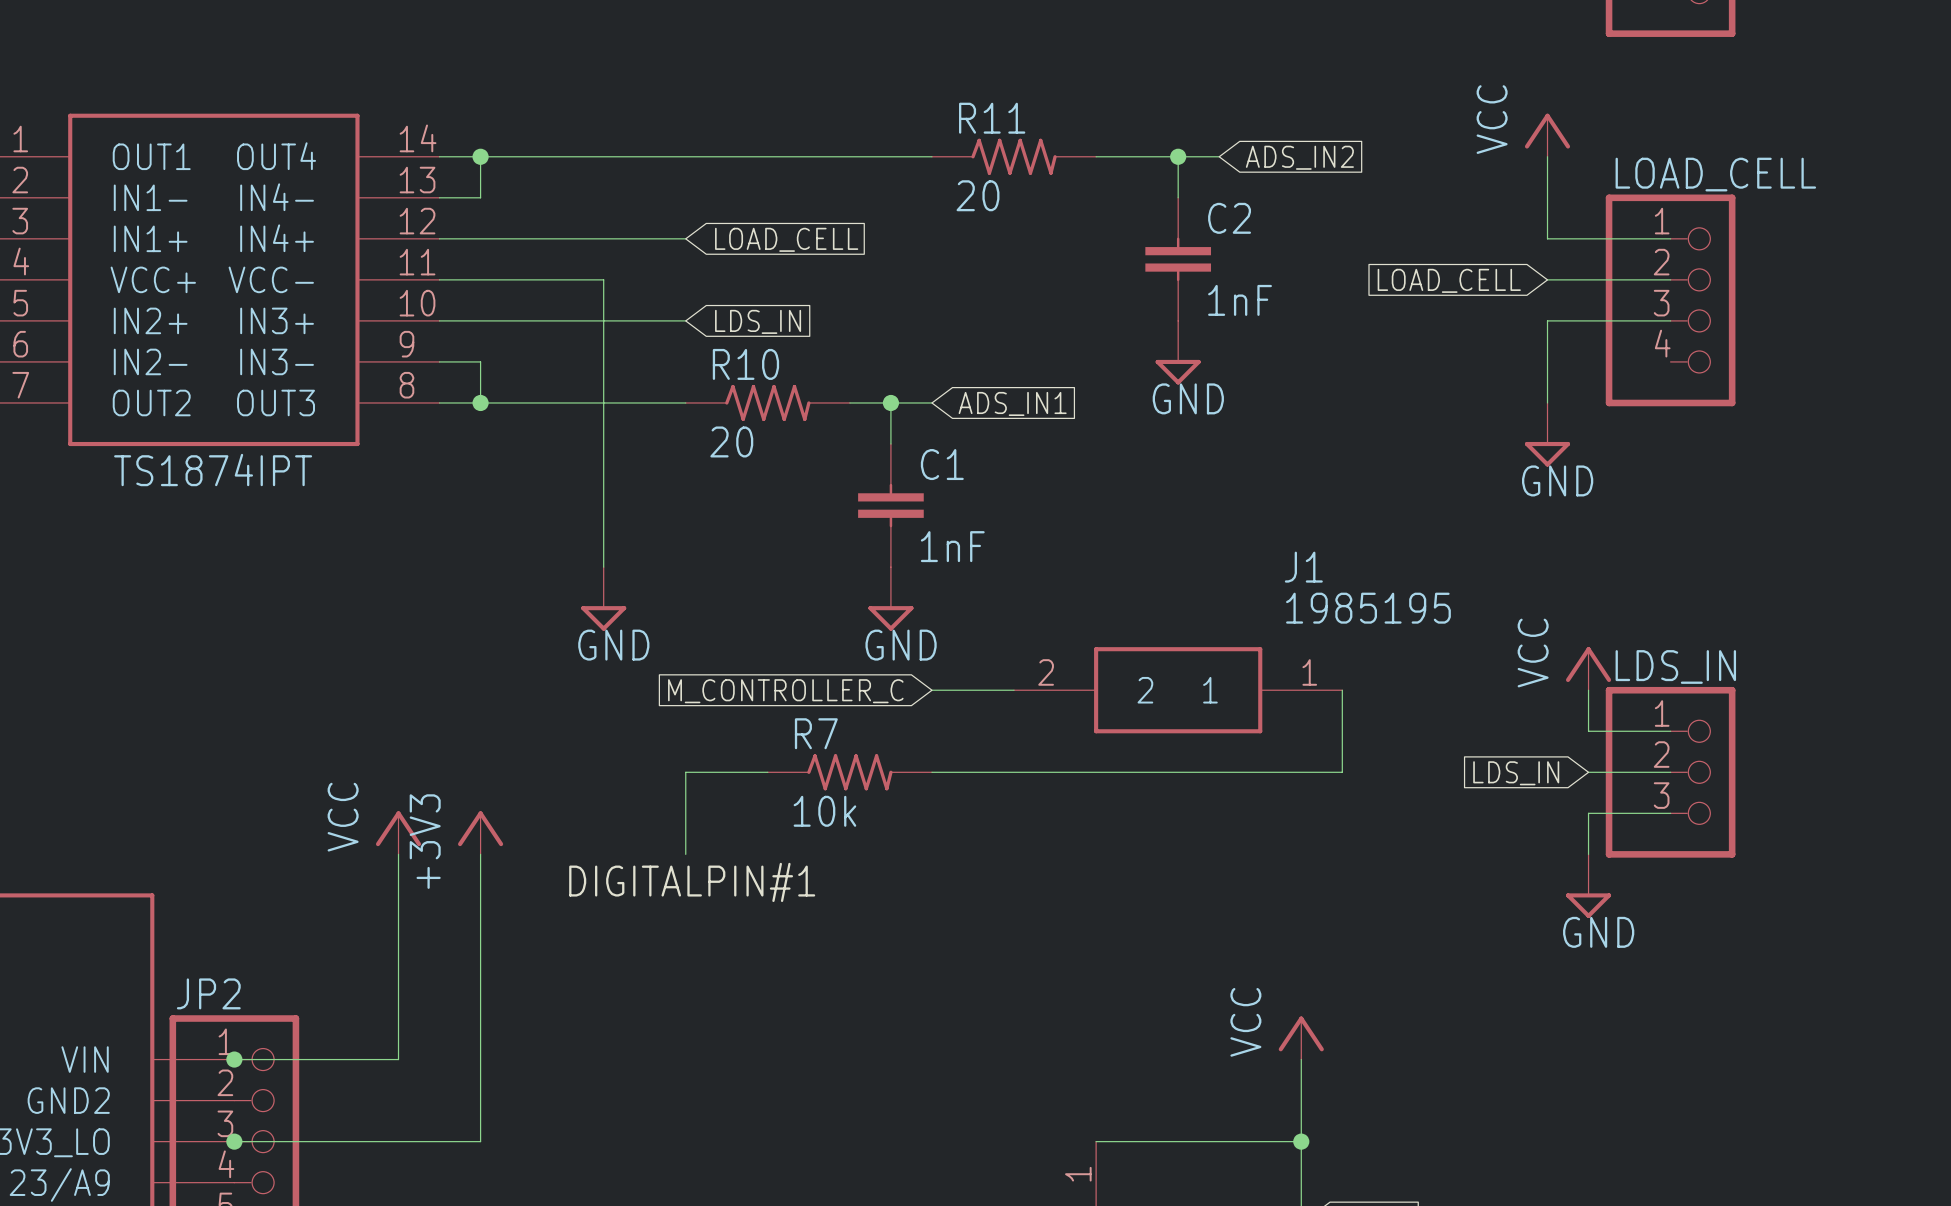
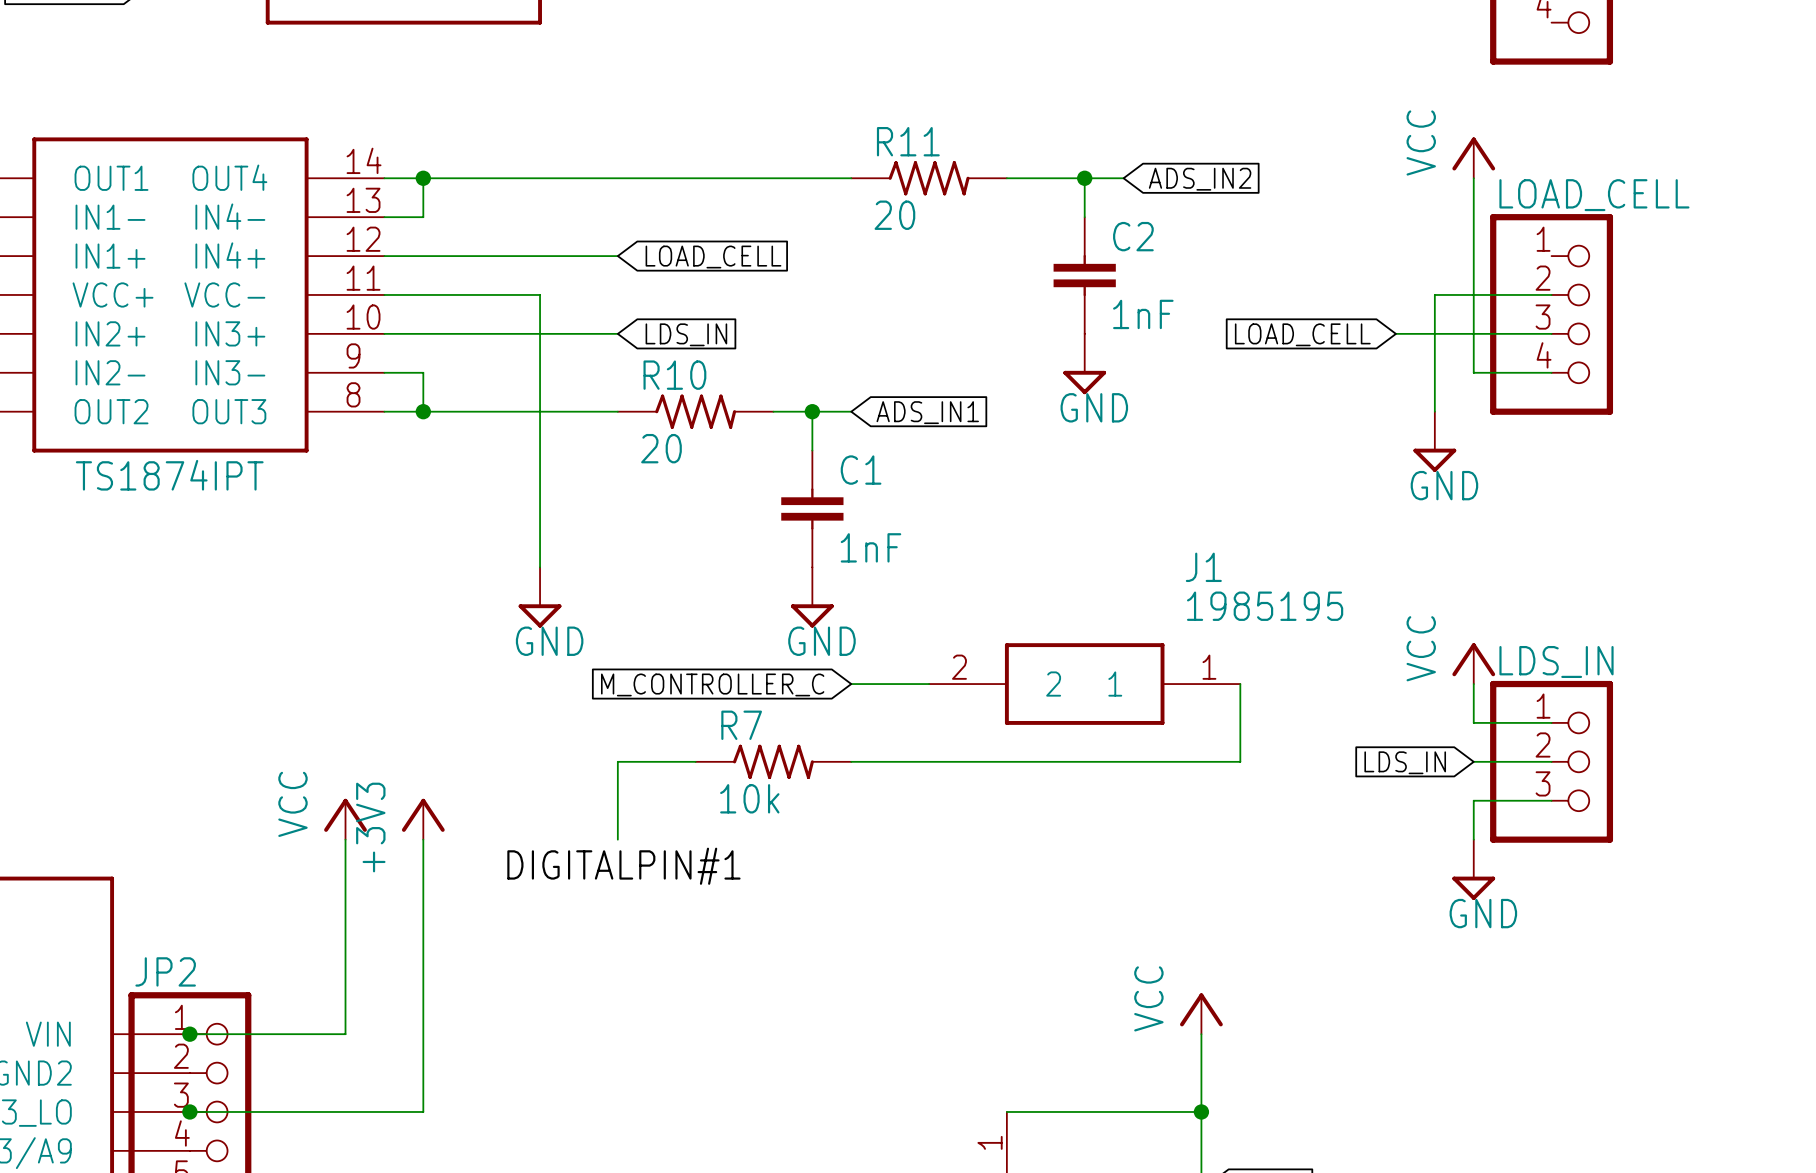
power symbol position: VCC (1547, 135) -> VCC (1473, 157)
wire: (1547, 156) (1547, 238) (1670, 238) -> none
wire: none -> (1473, 178) (1473, 372) (1551, 372)
wire: none -> (1434, 294) (1434, 333) (1395, 333)
global label position: LOAD_CELL (1449, 280) -> LOAD_CELL (1302, 334)

